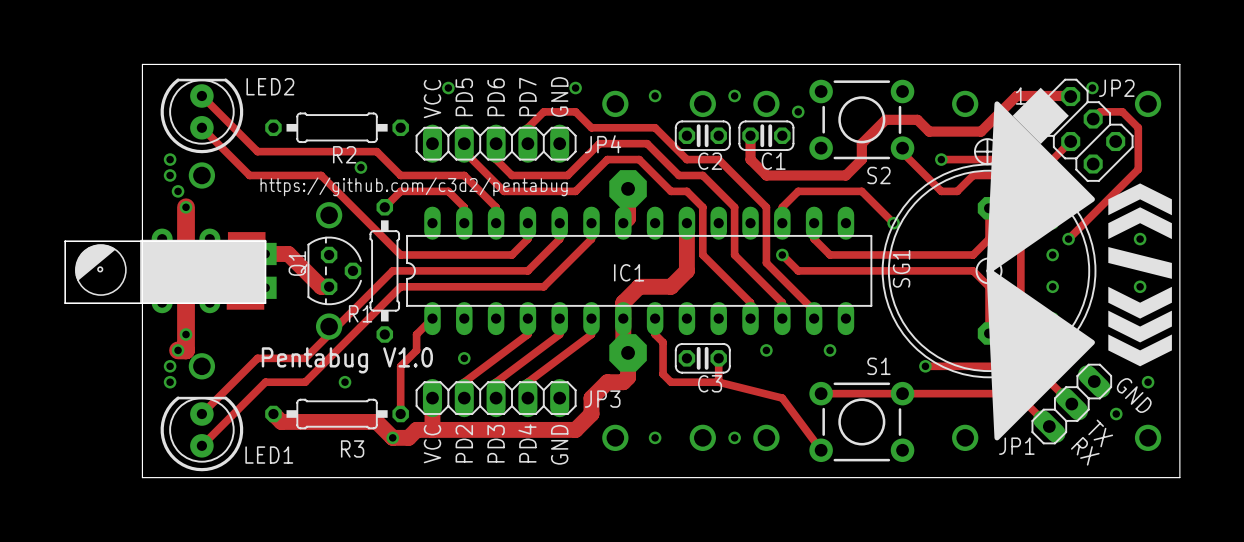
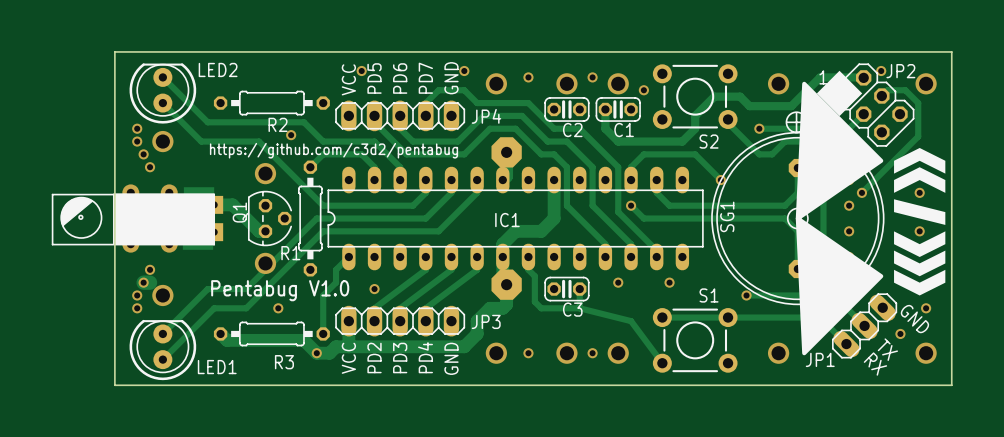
track: (186, 207) (186, 350) -> none
part footprint: [64, 232, 277, 310] -> [51, 187, 224, 250]

